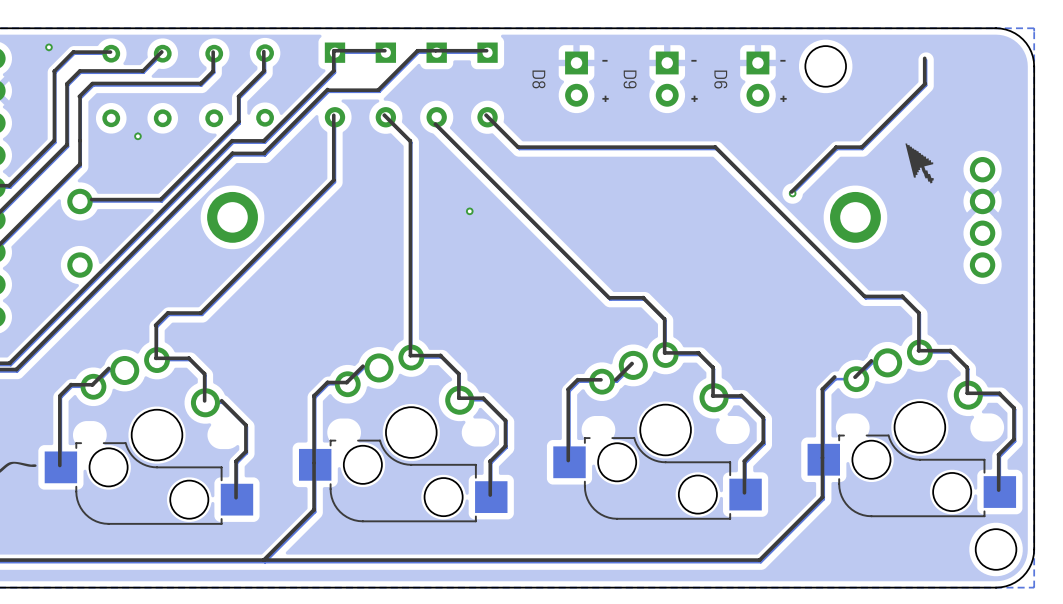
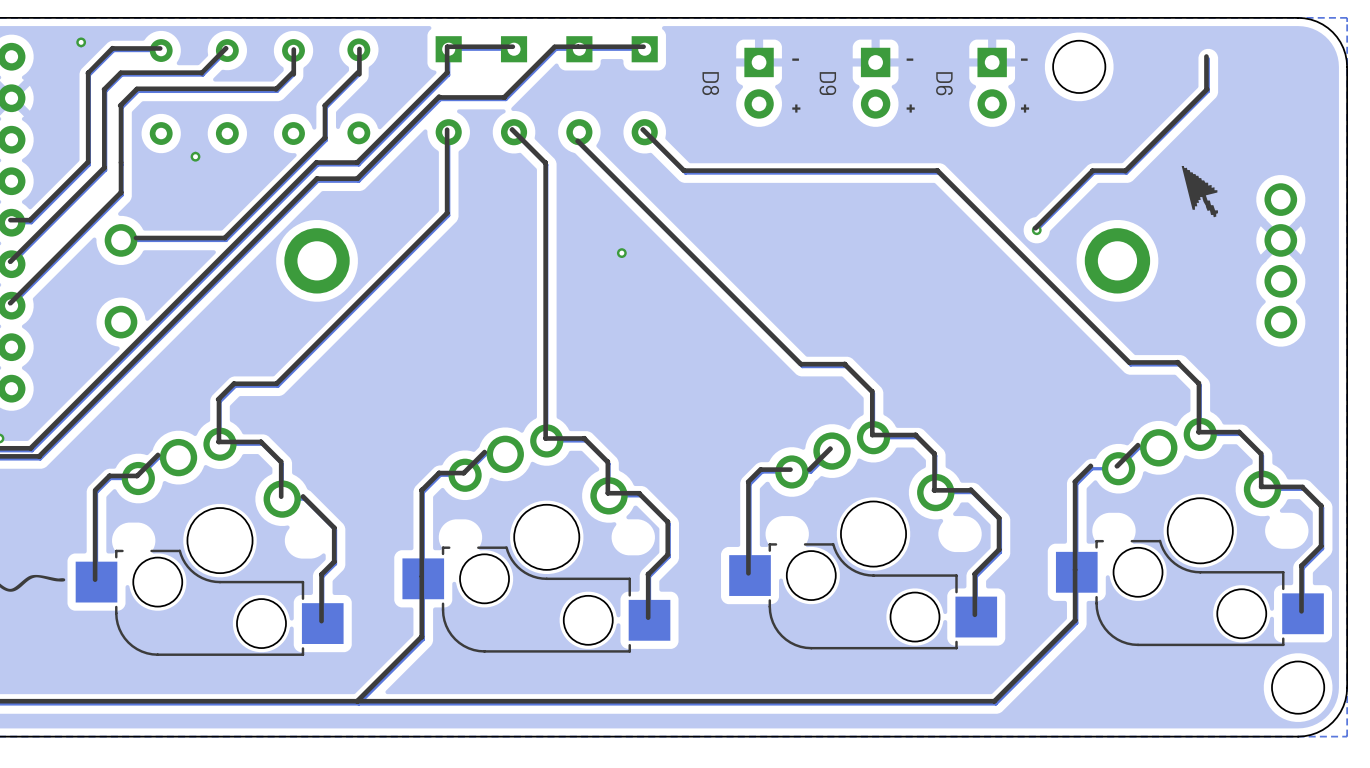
drawing: [211, 50, 215, 74] -> none
drawing: none -> [357, 46, 362, 77]
drawing position: (263, 61) -> (293, 61)

